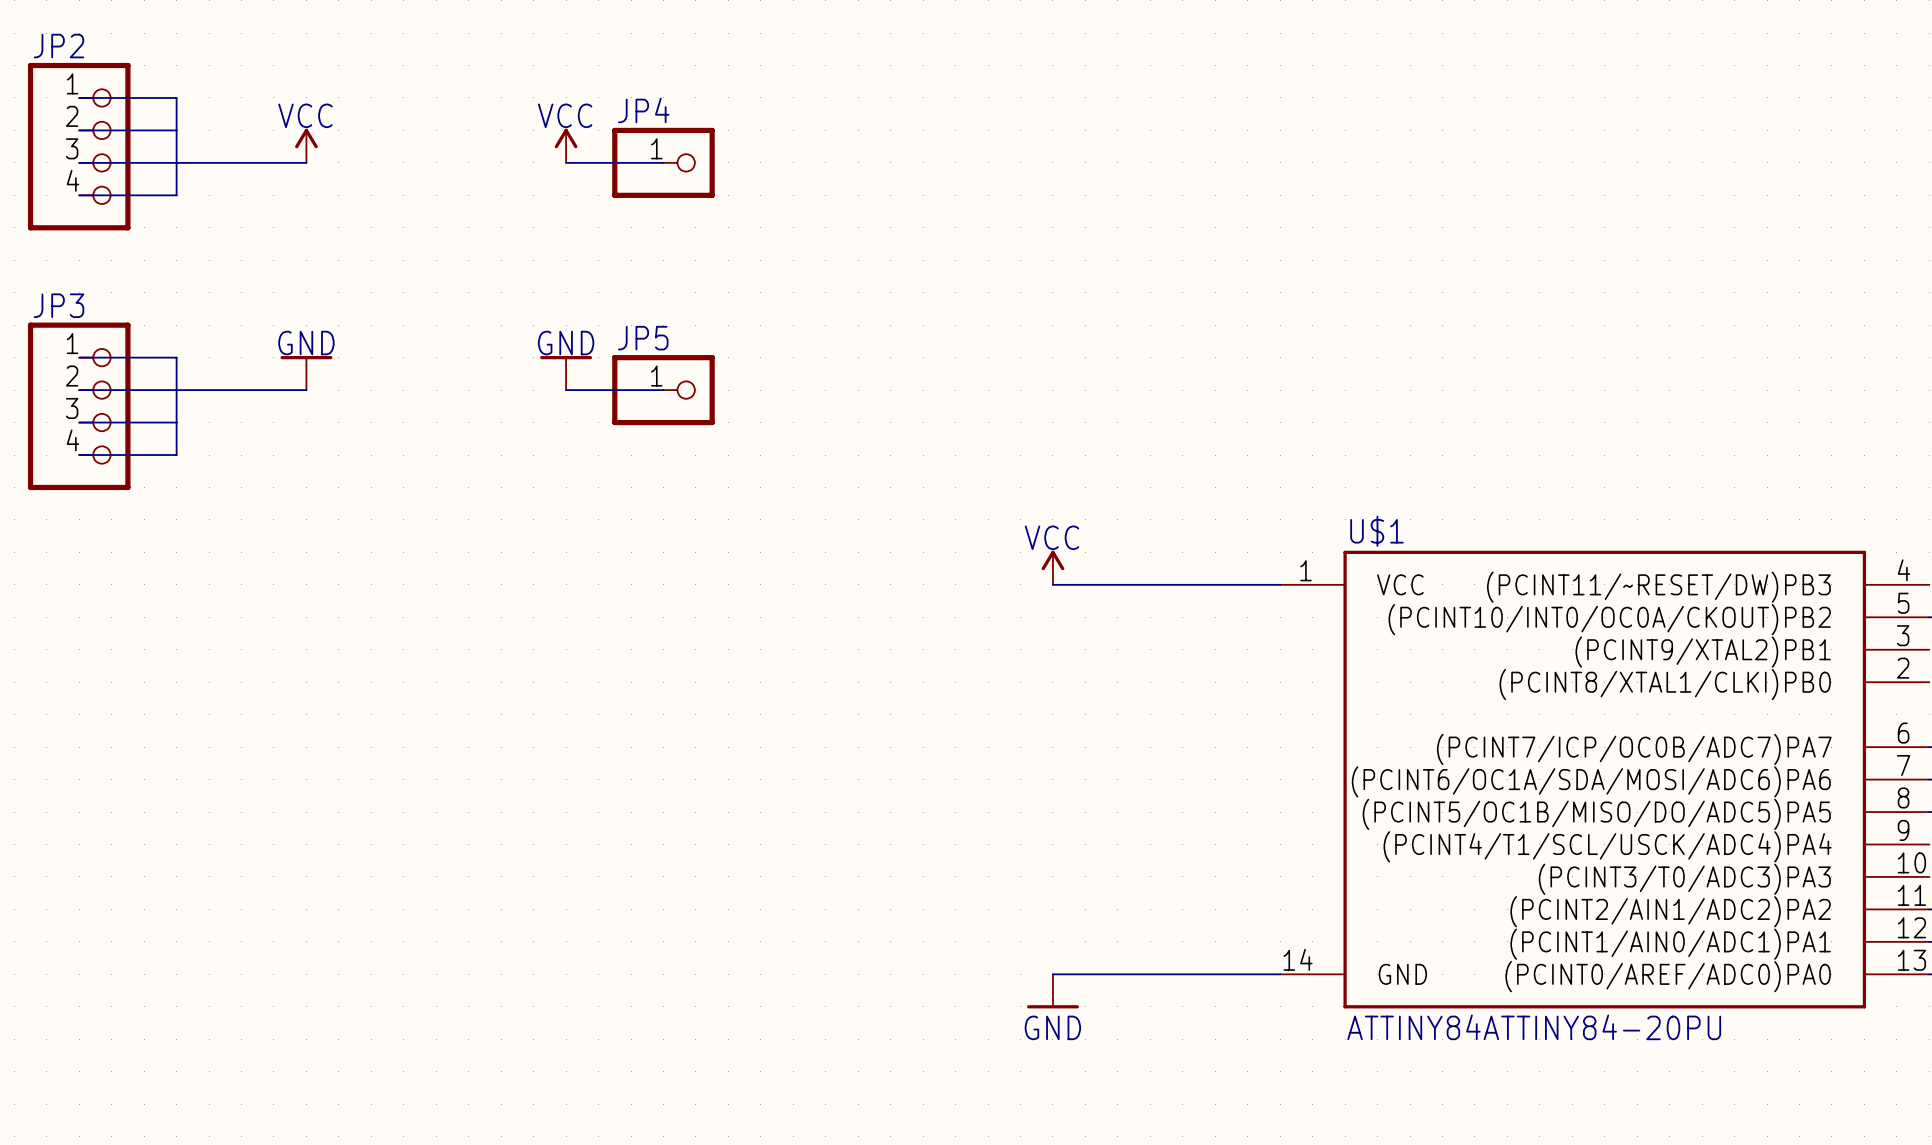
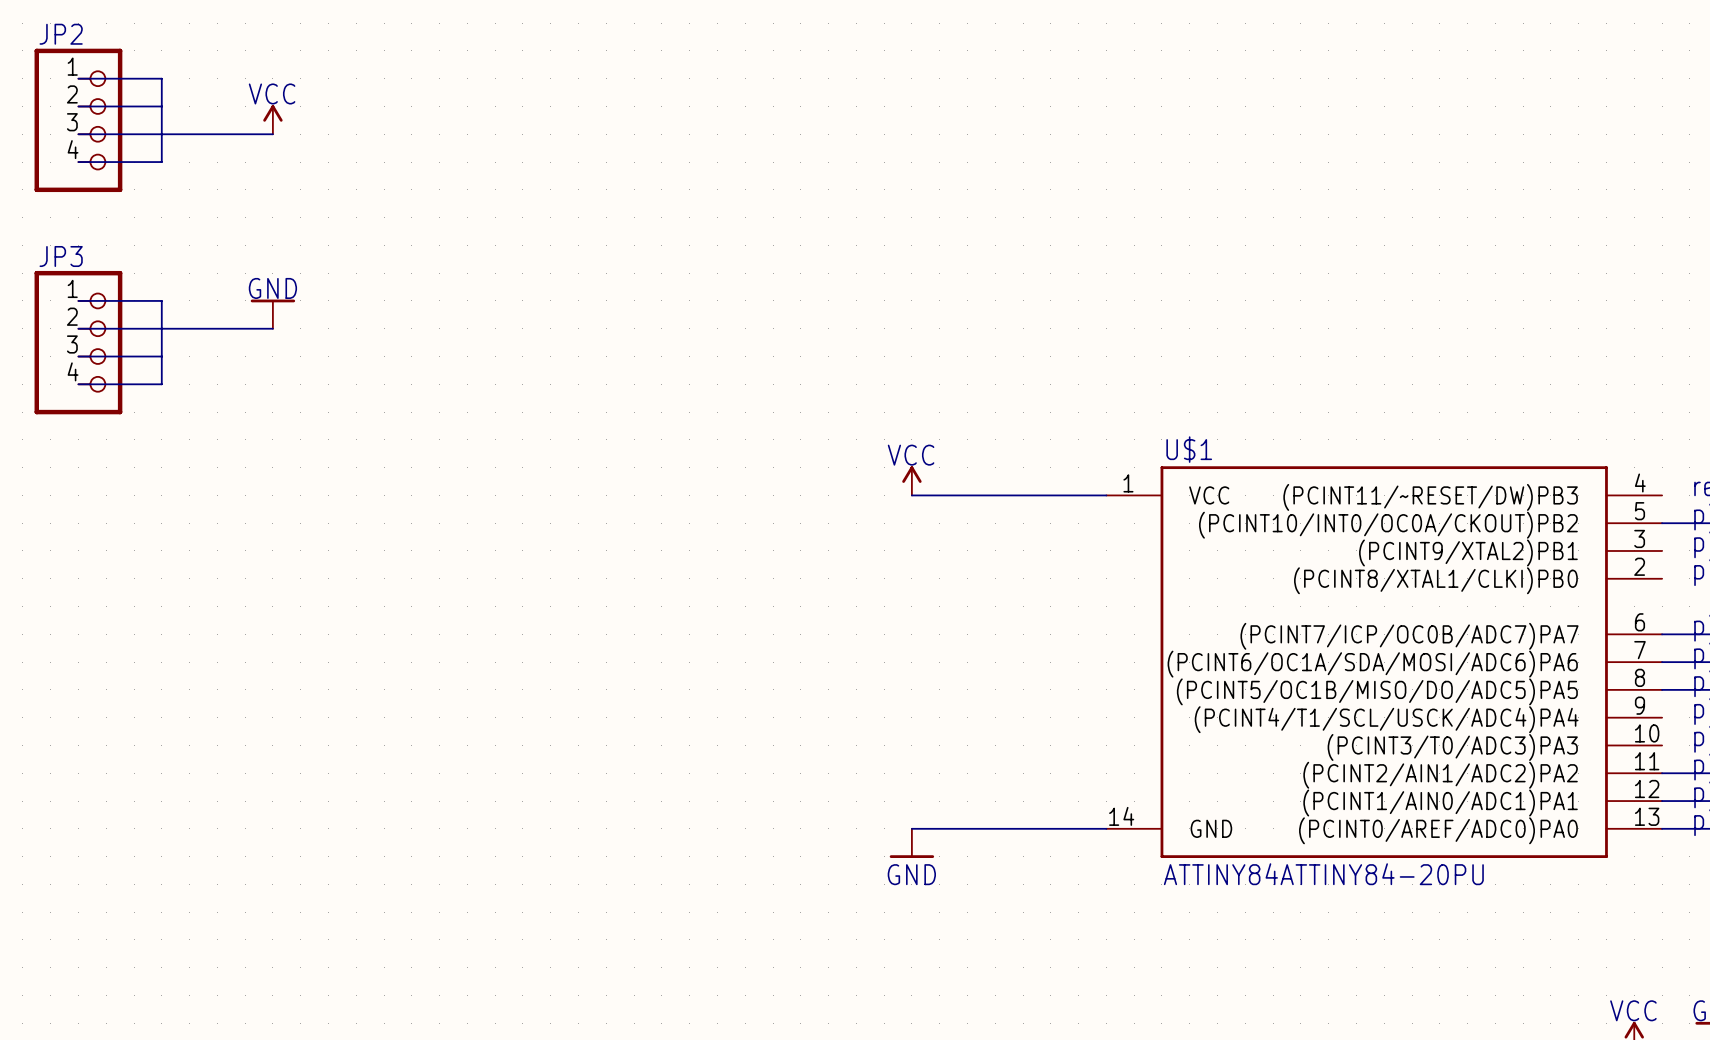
power symbol: VCC (566, 145) -> none
wire: (566, 162) (663, 162) -> none
JP4: (663, 162) -> none
power symbol: GND (566, 373) -> none
wire: (566, 390) (663, 390) -> none
JP5: (663, 390) -> none

